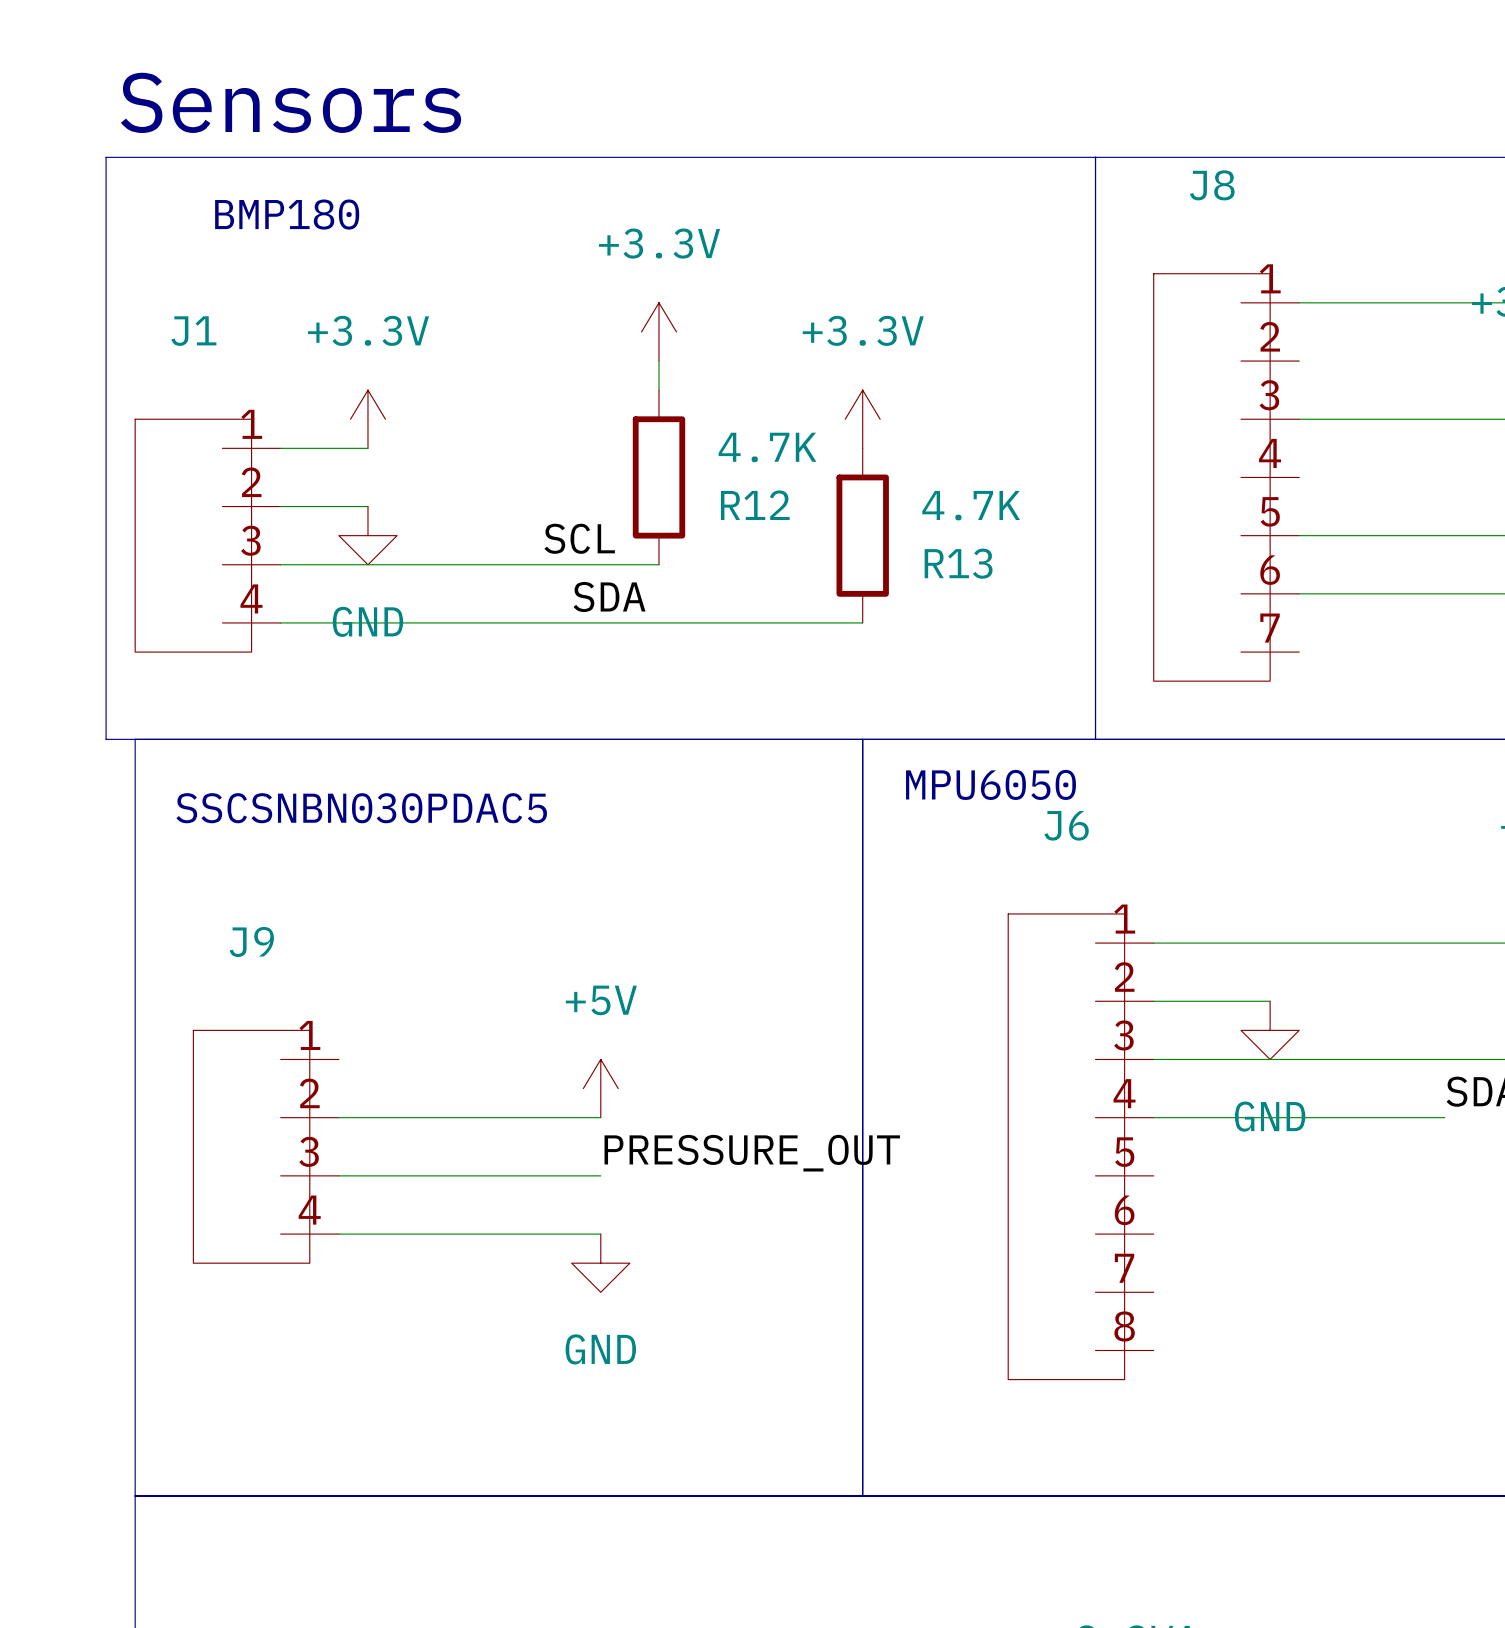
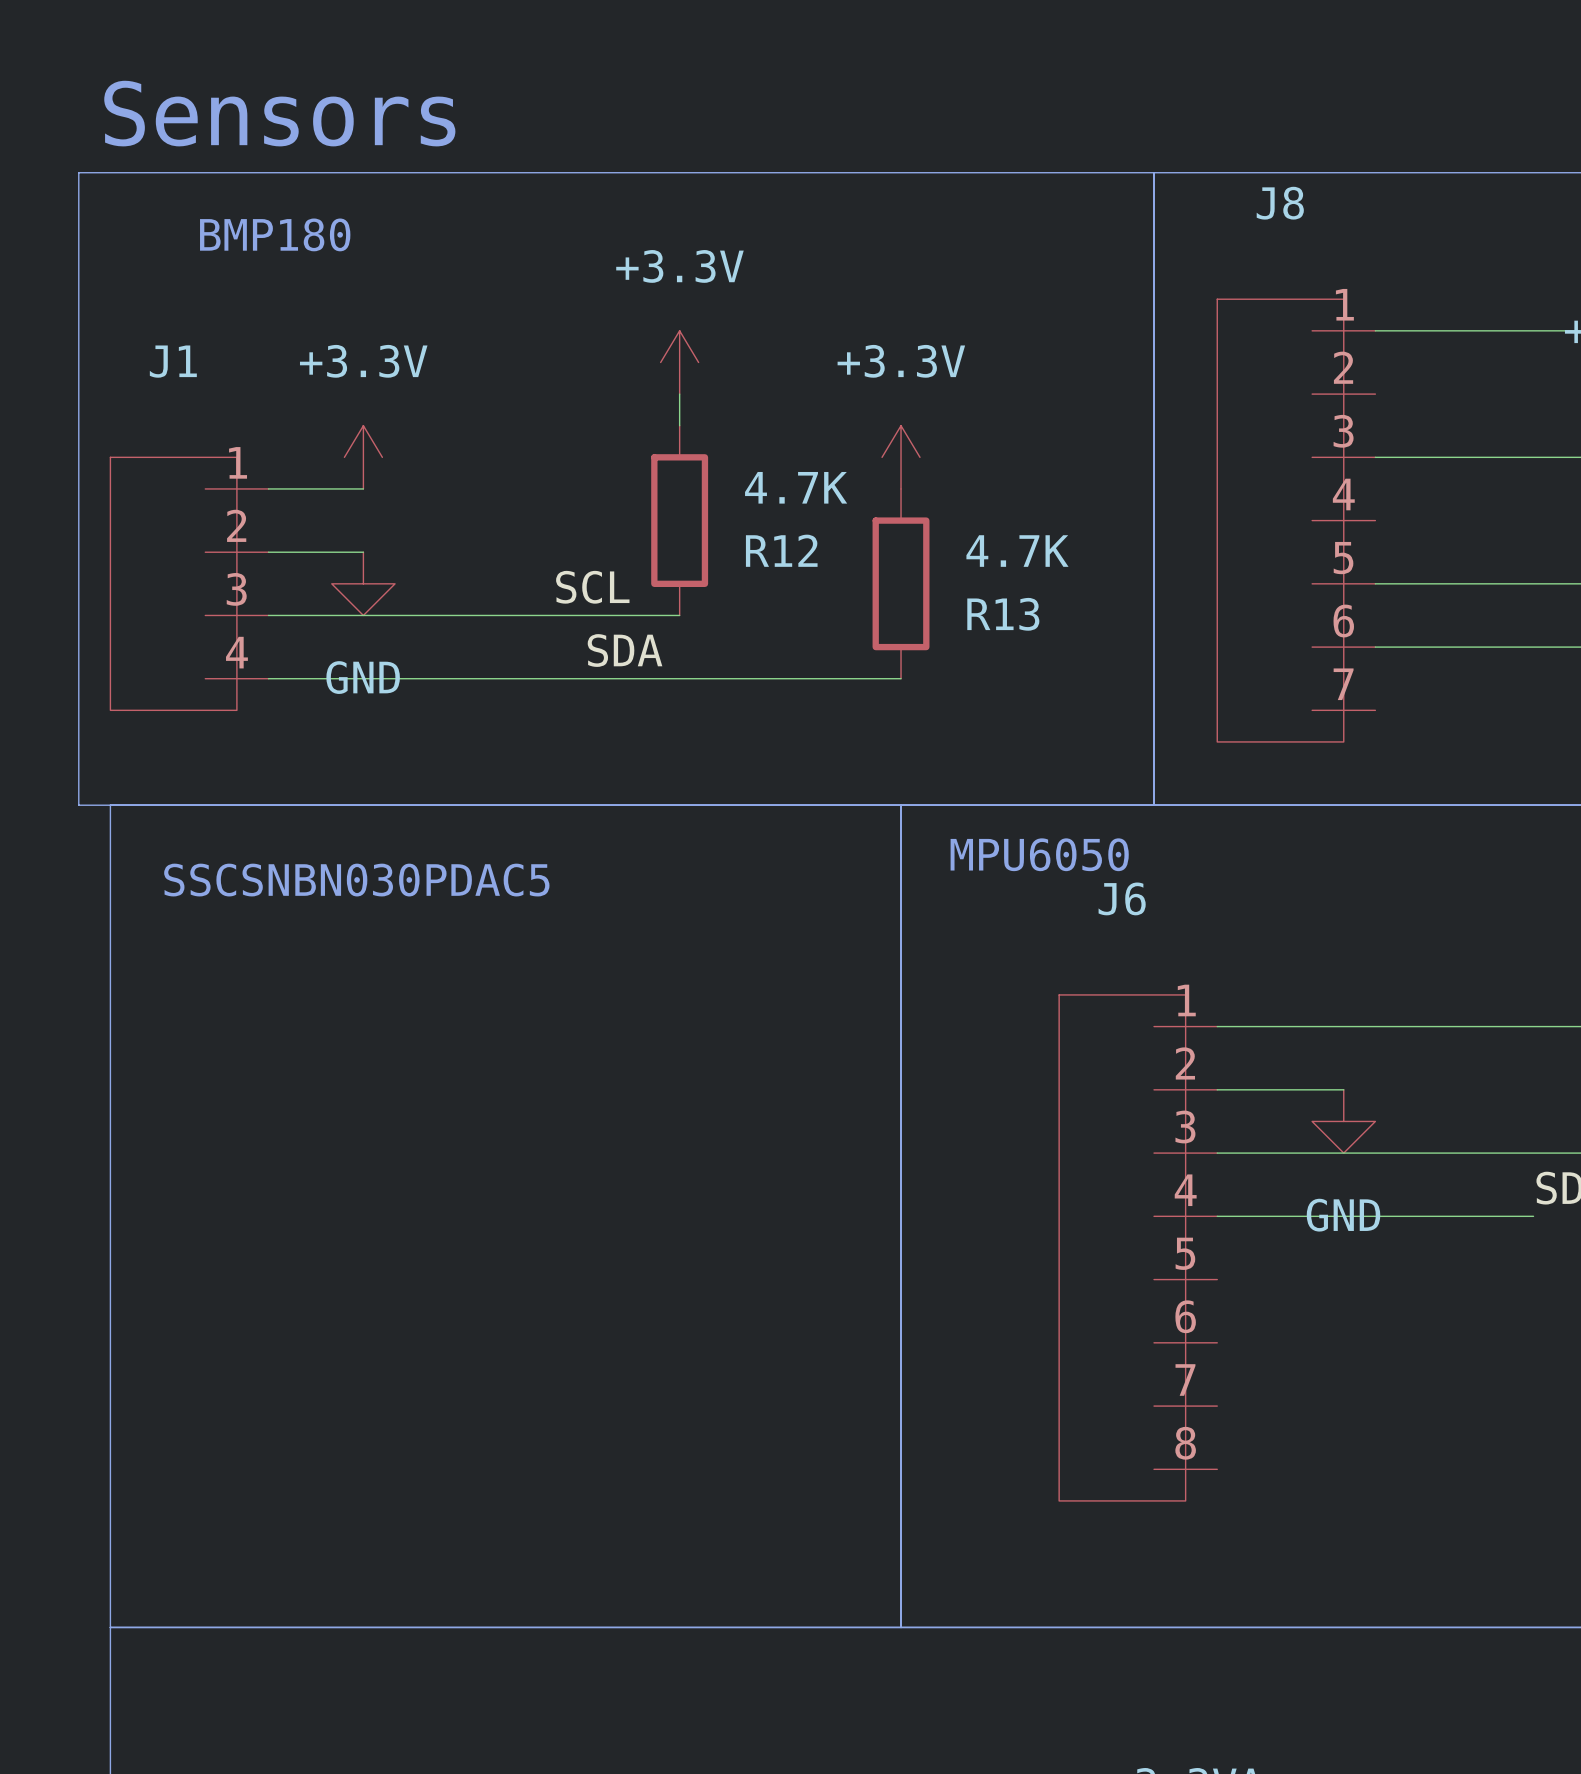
power symbol: +5V (600, 1088) -> none
wire: (338, 1117) (600, 1117) -> none
J9: (266, 1146) -> none
label: PRESSURE_OUT (752, 1153) -> none
wire: (338, 1175) (600, 1175) -> none
wire: (338, 1234) (600, 1234) -> none
power symbol: GND (600, 1263) -> none

